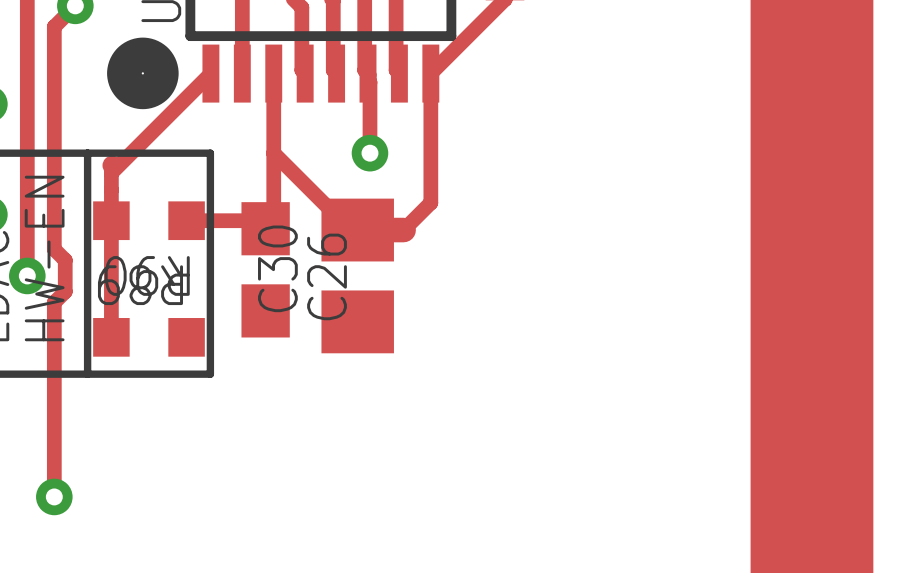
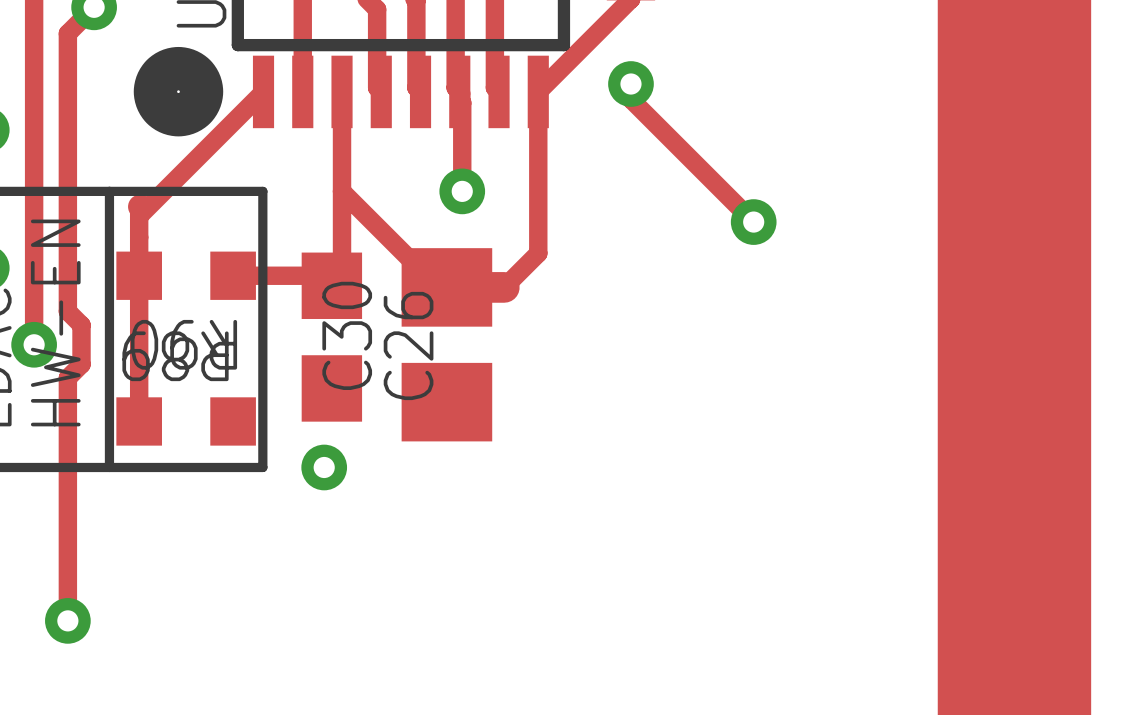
track: none -> (630, 84) (630, 99) (753, 222)
via: none -> (630, 84)
via: none -> (753, 222)
via: none -> (324, 467)

